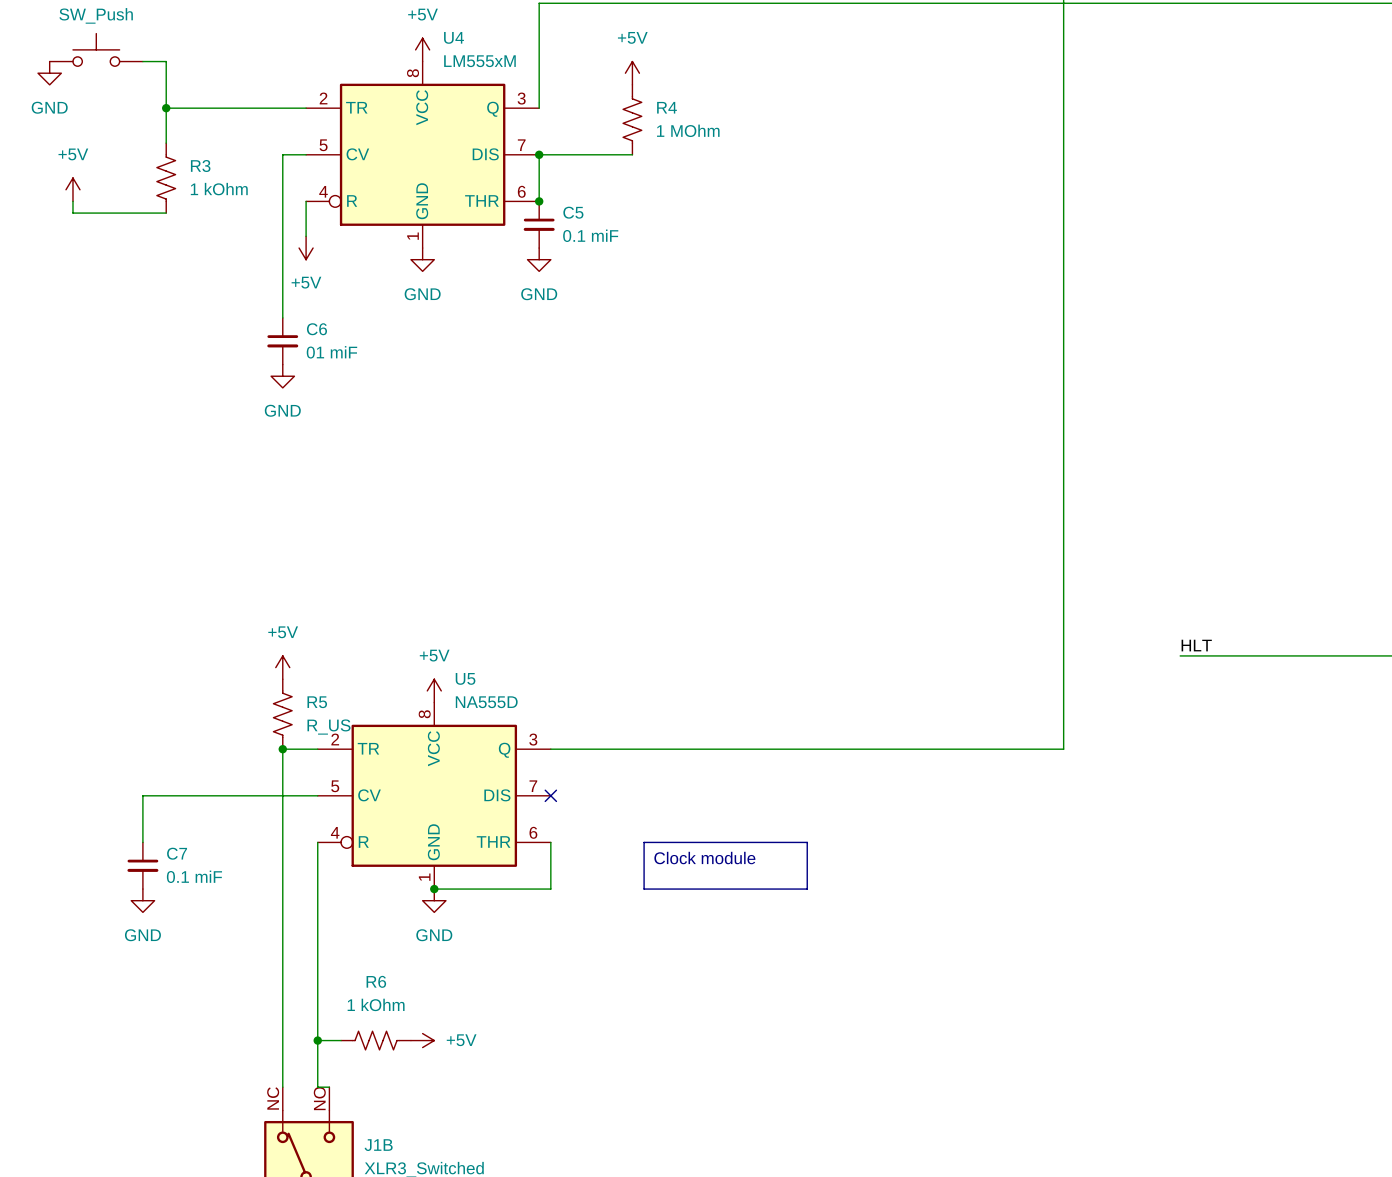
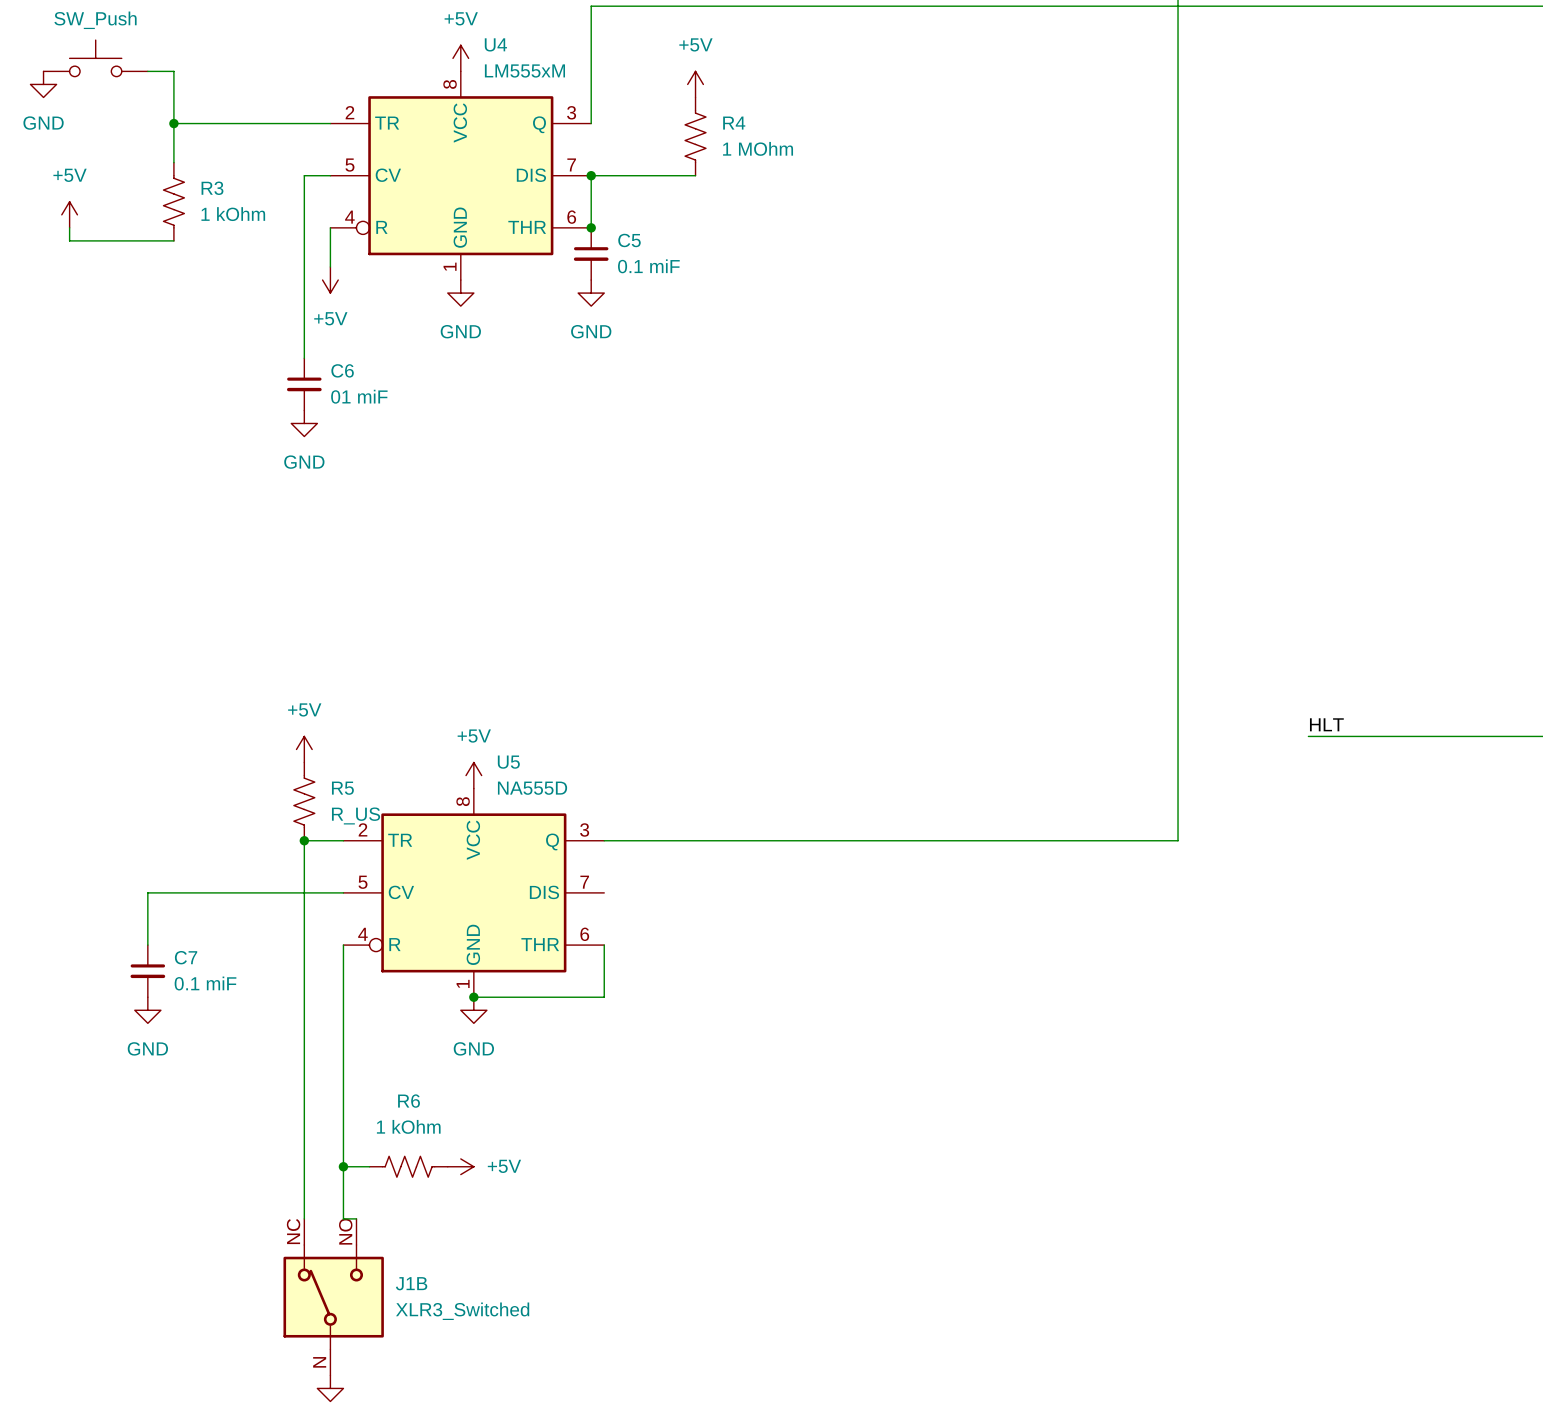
no-connect mark: (550, 795) -> none
line: (644, 842) (807, 842) (807, 889) (644, 889) (644, 842) -> none
text: Clock module (704, 858) -> none

